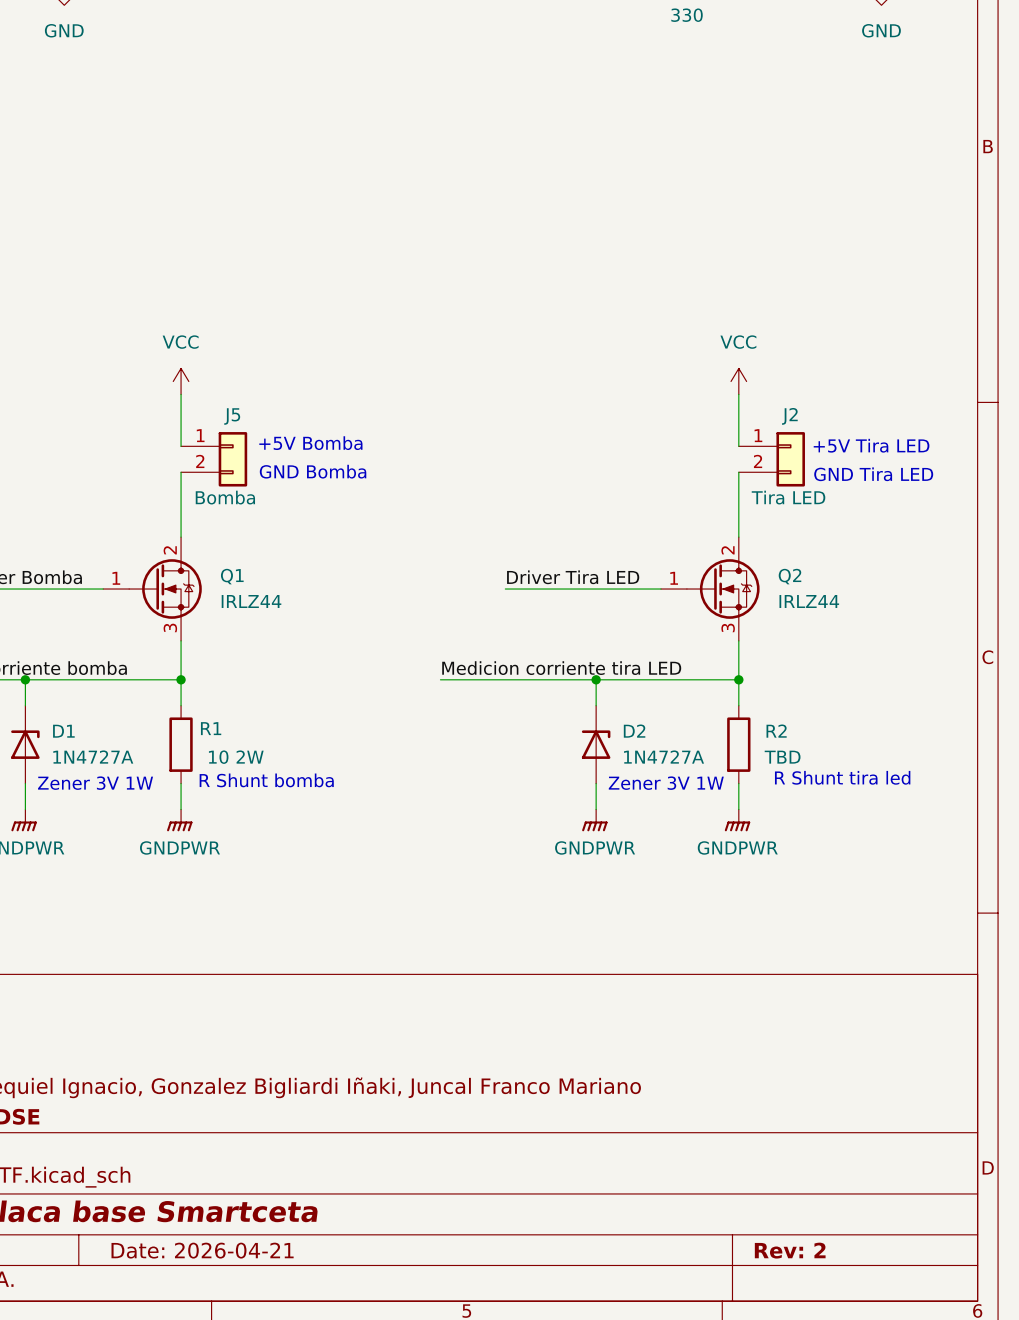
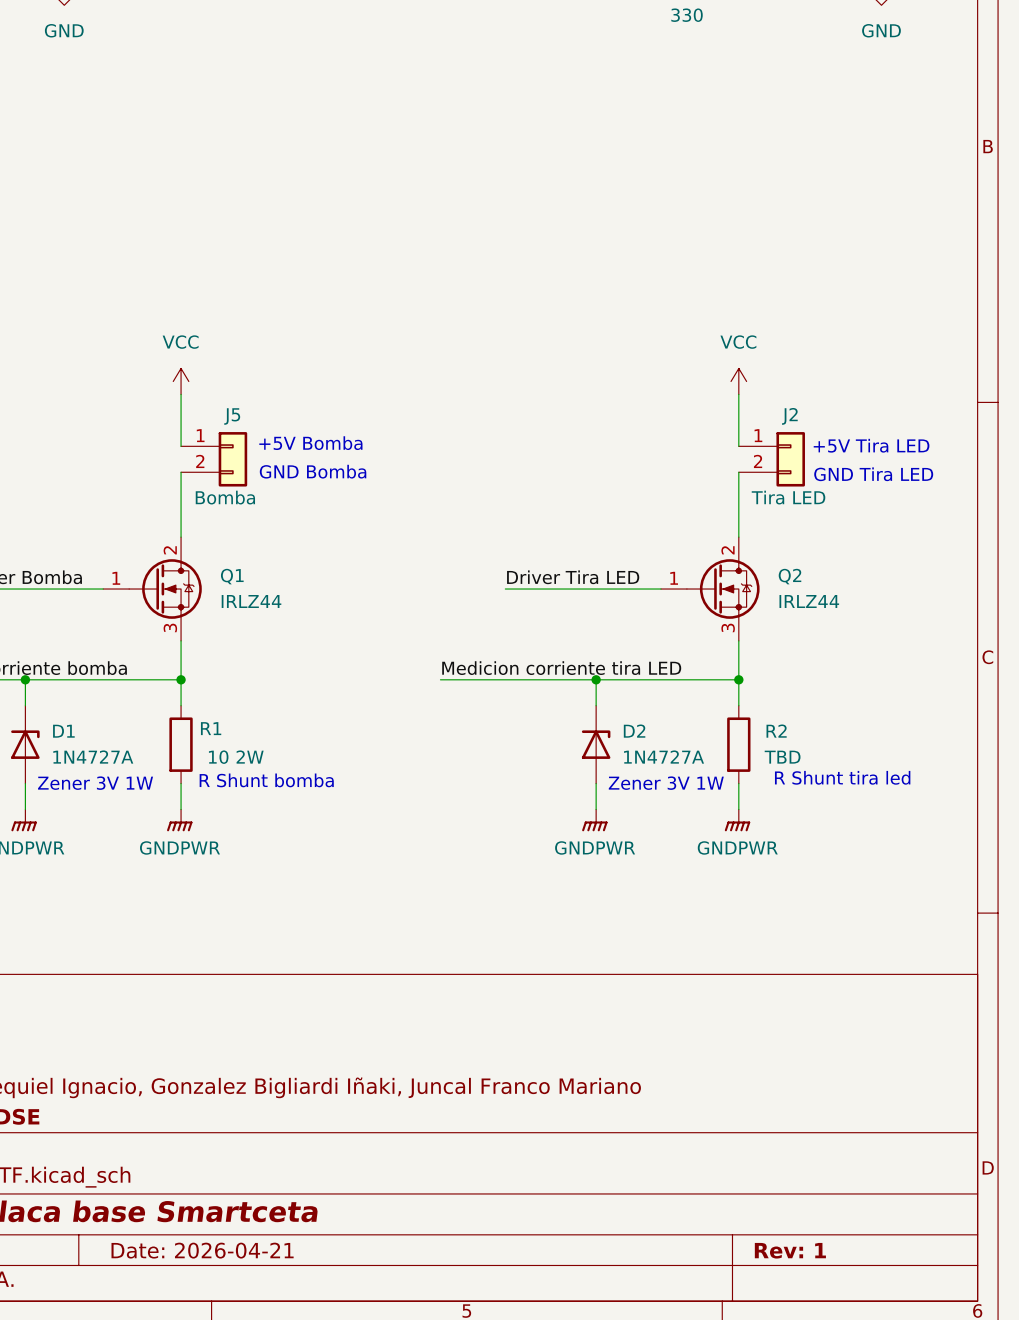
title block: Rev: 2 (790, 1250) -> Rev: 1 (790, 1250)

